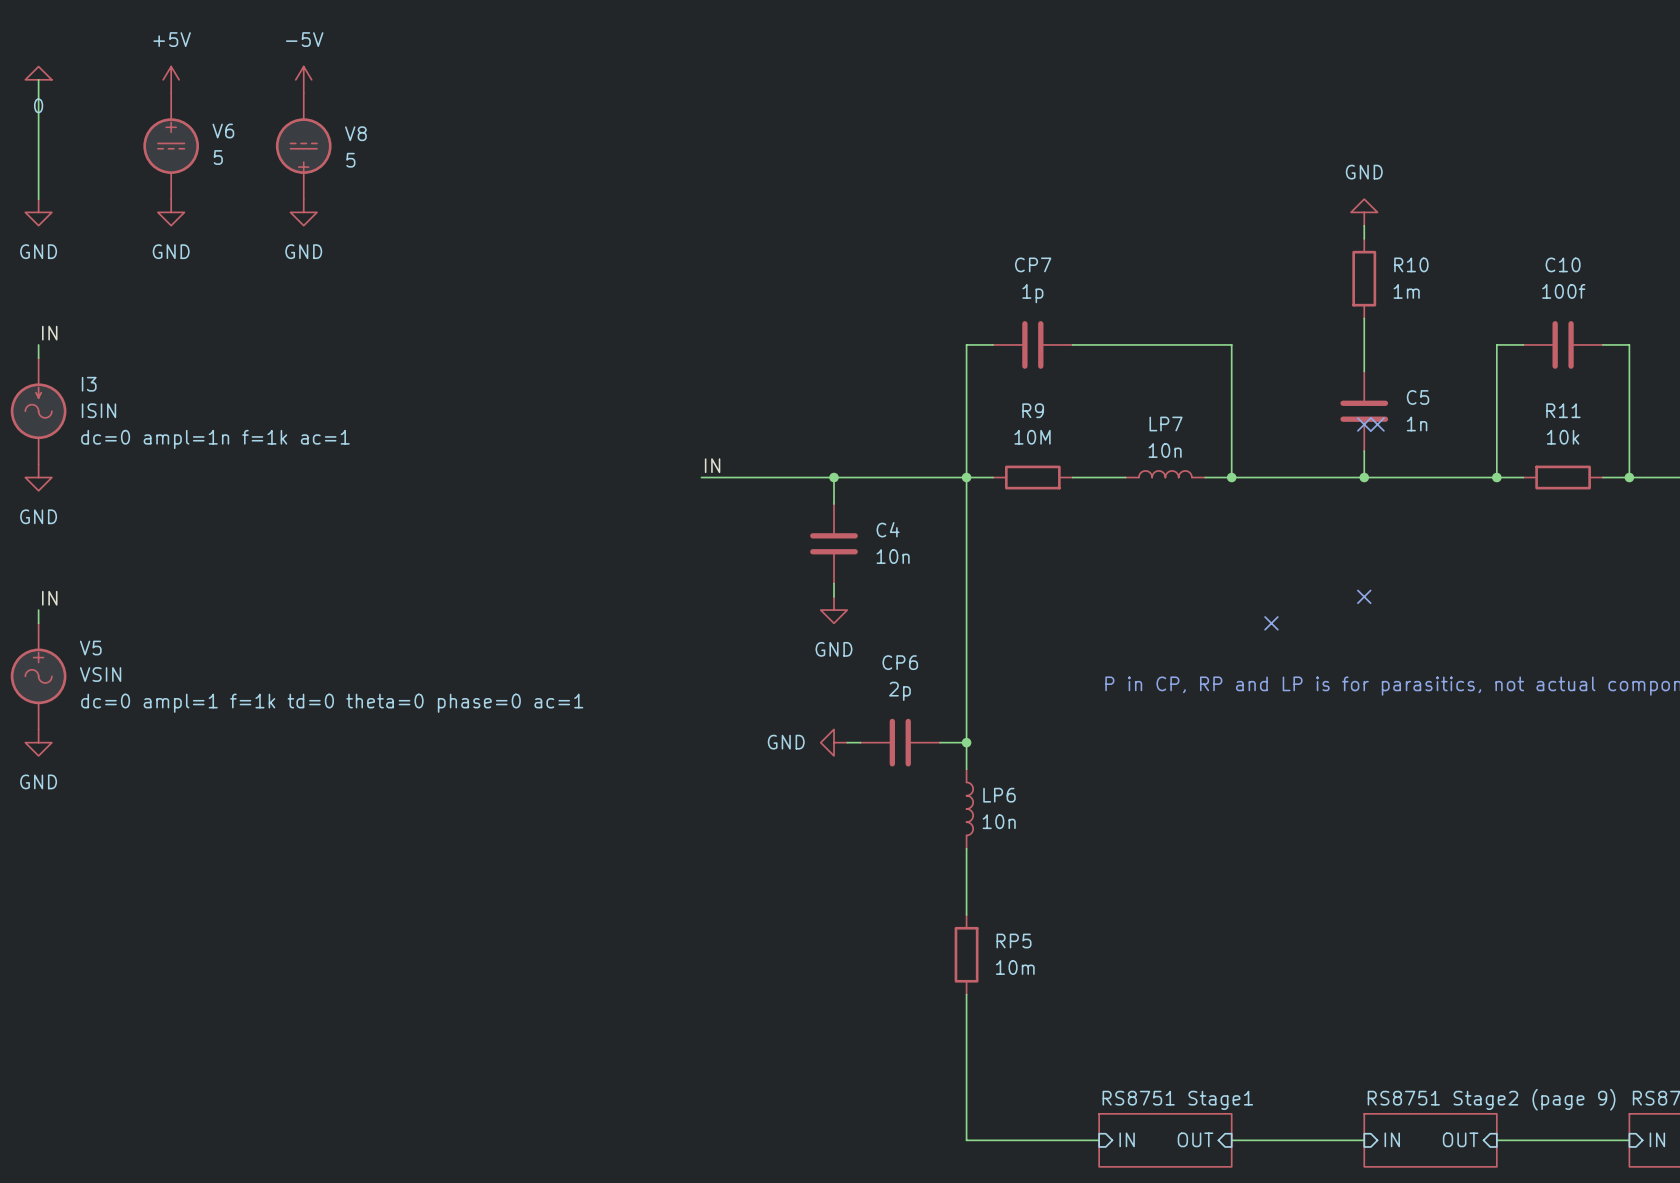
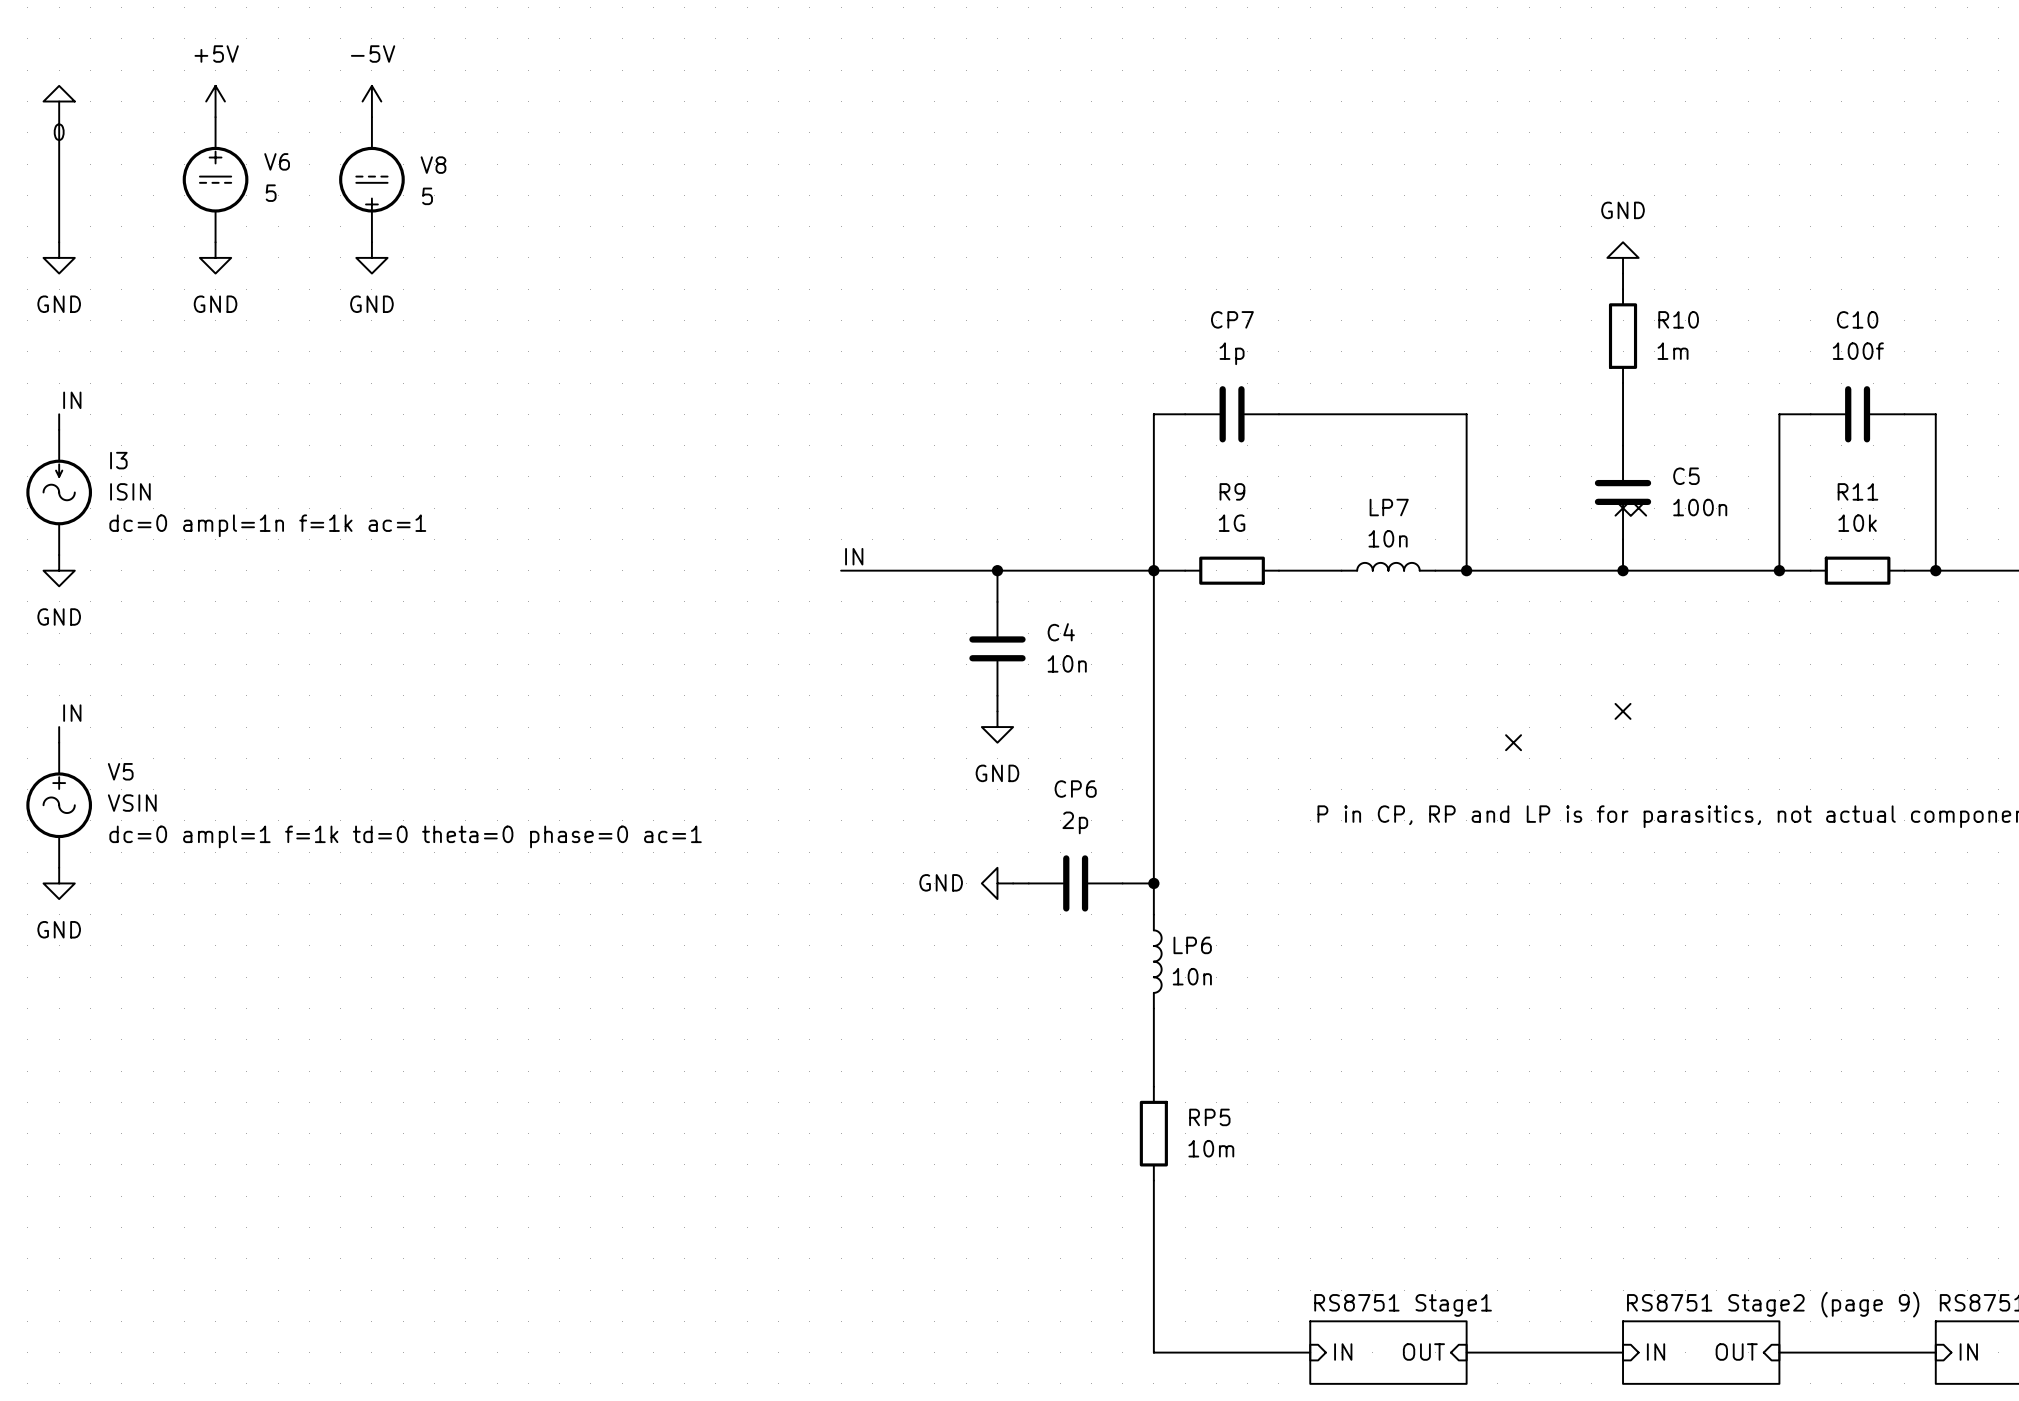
C5 value: 1n (1417, 424) -> 100n (1700, 507)
R9 value: 10M (1032, 437) -> 1G (1232, 523)

